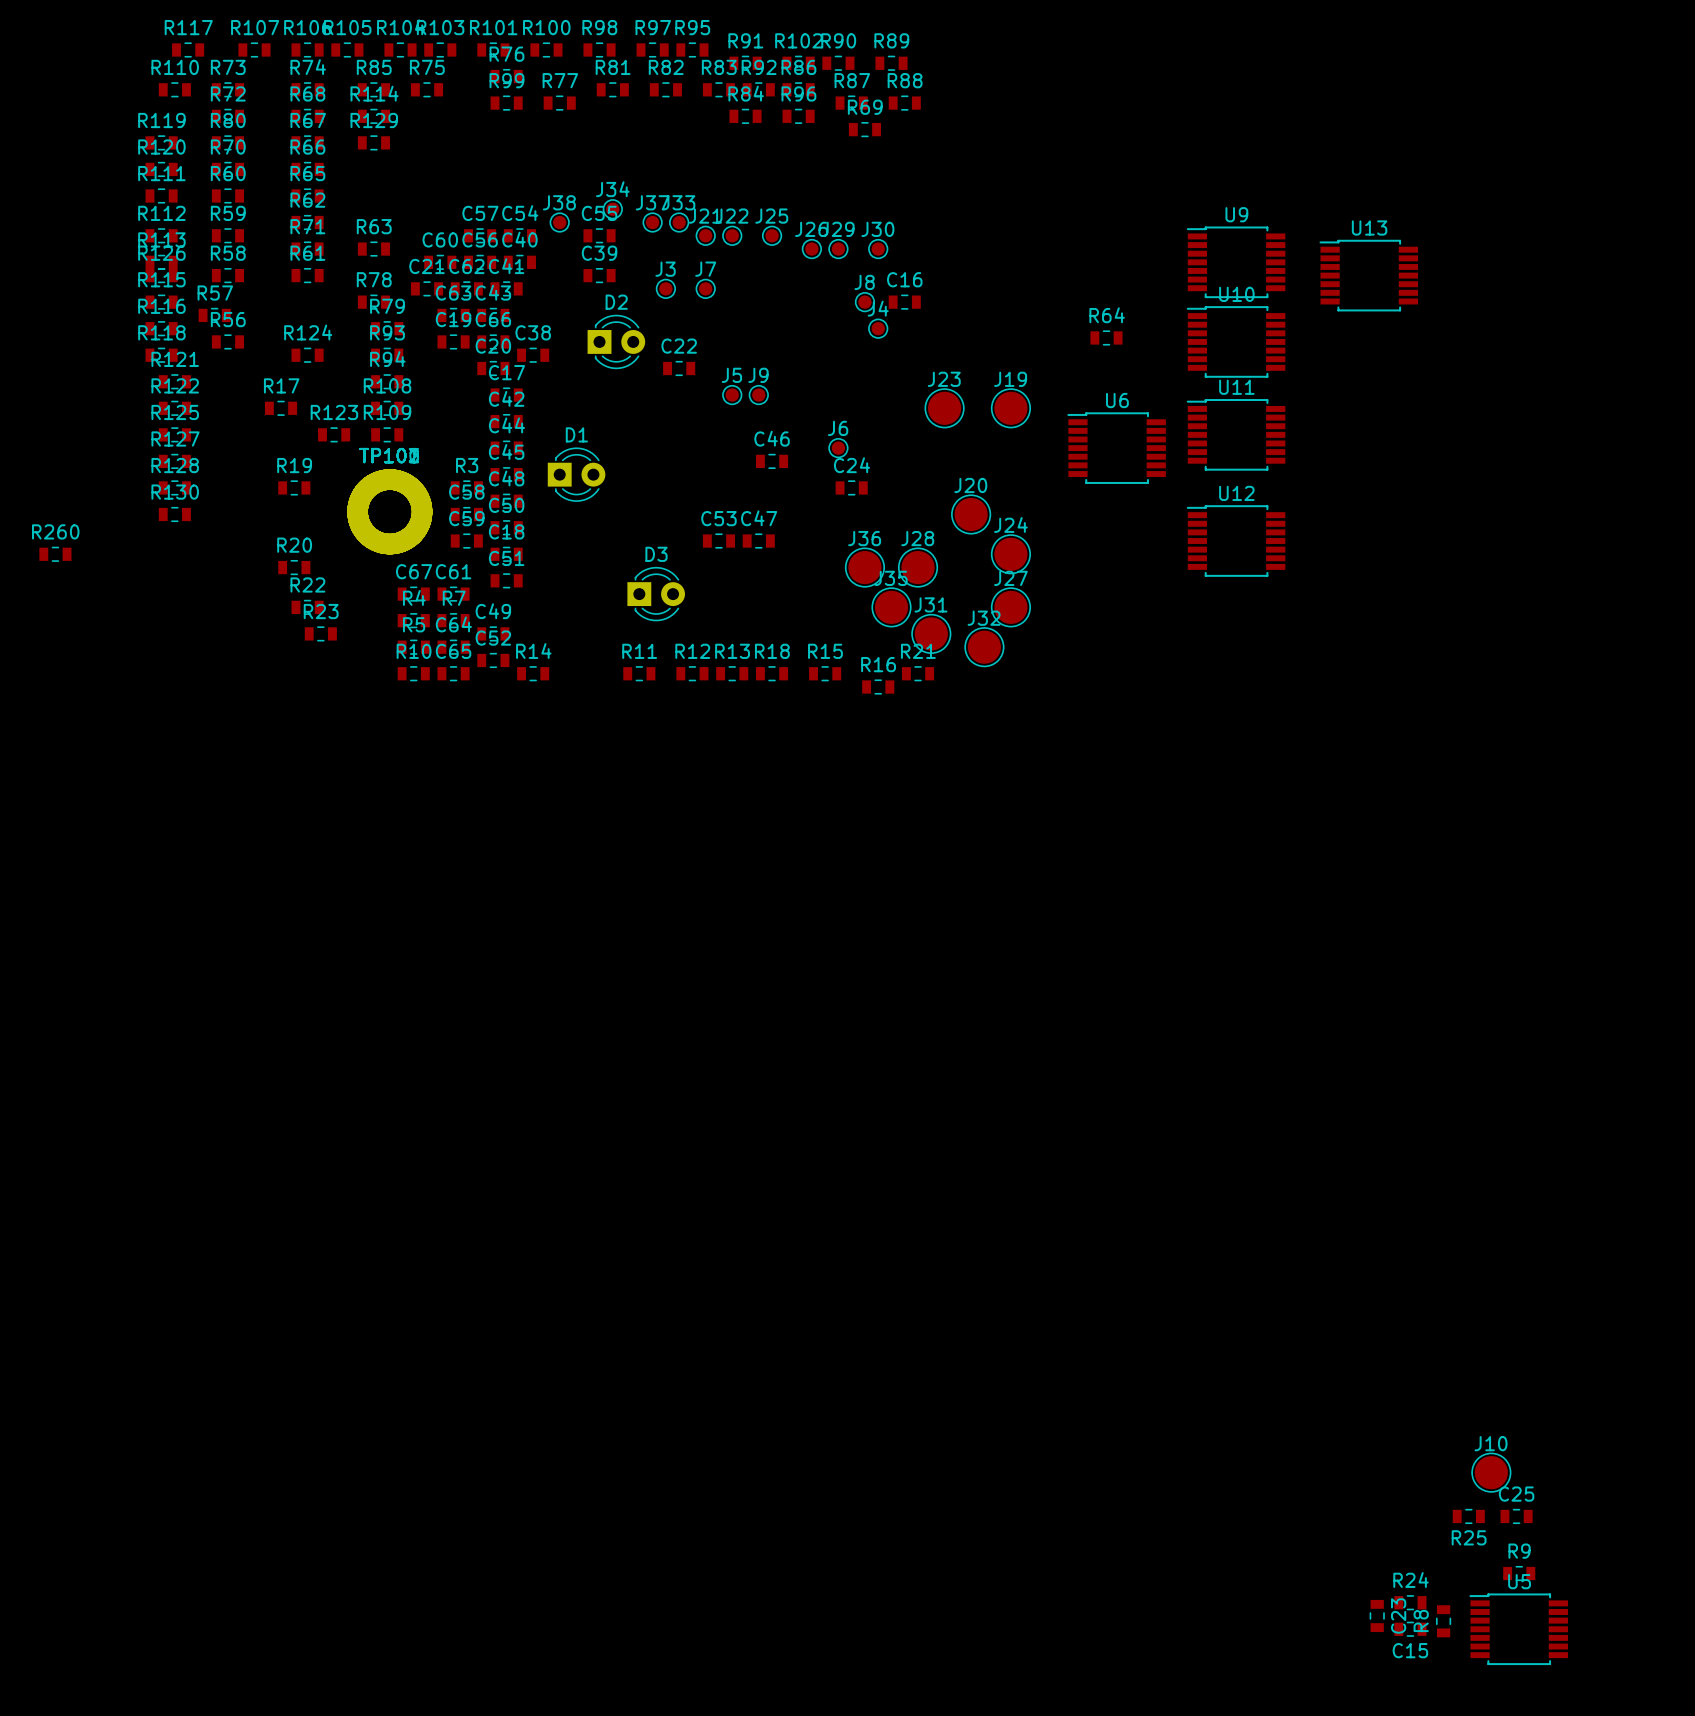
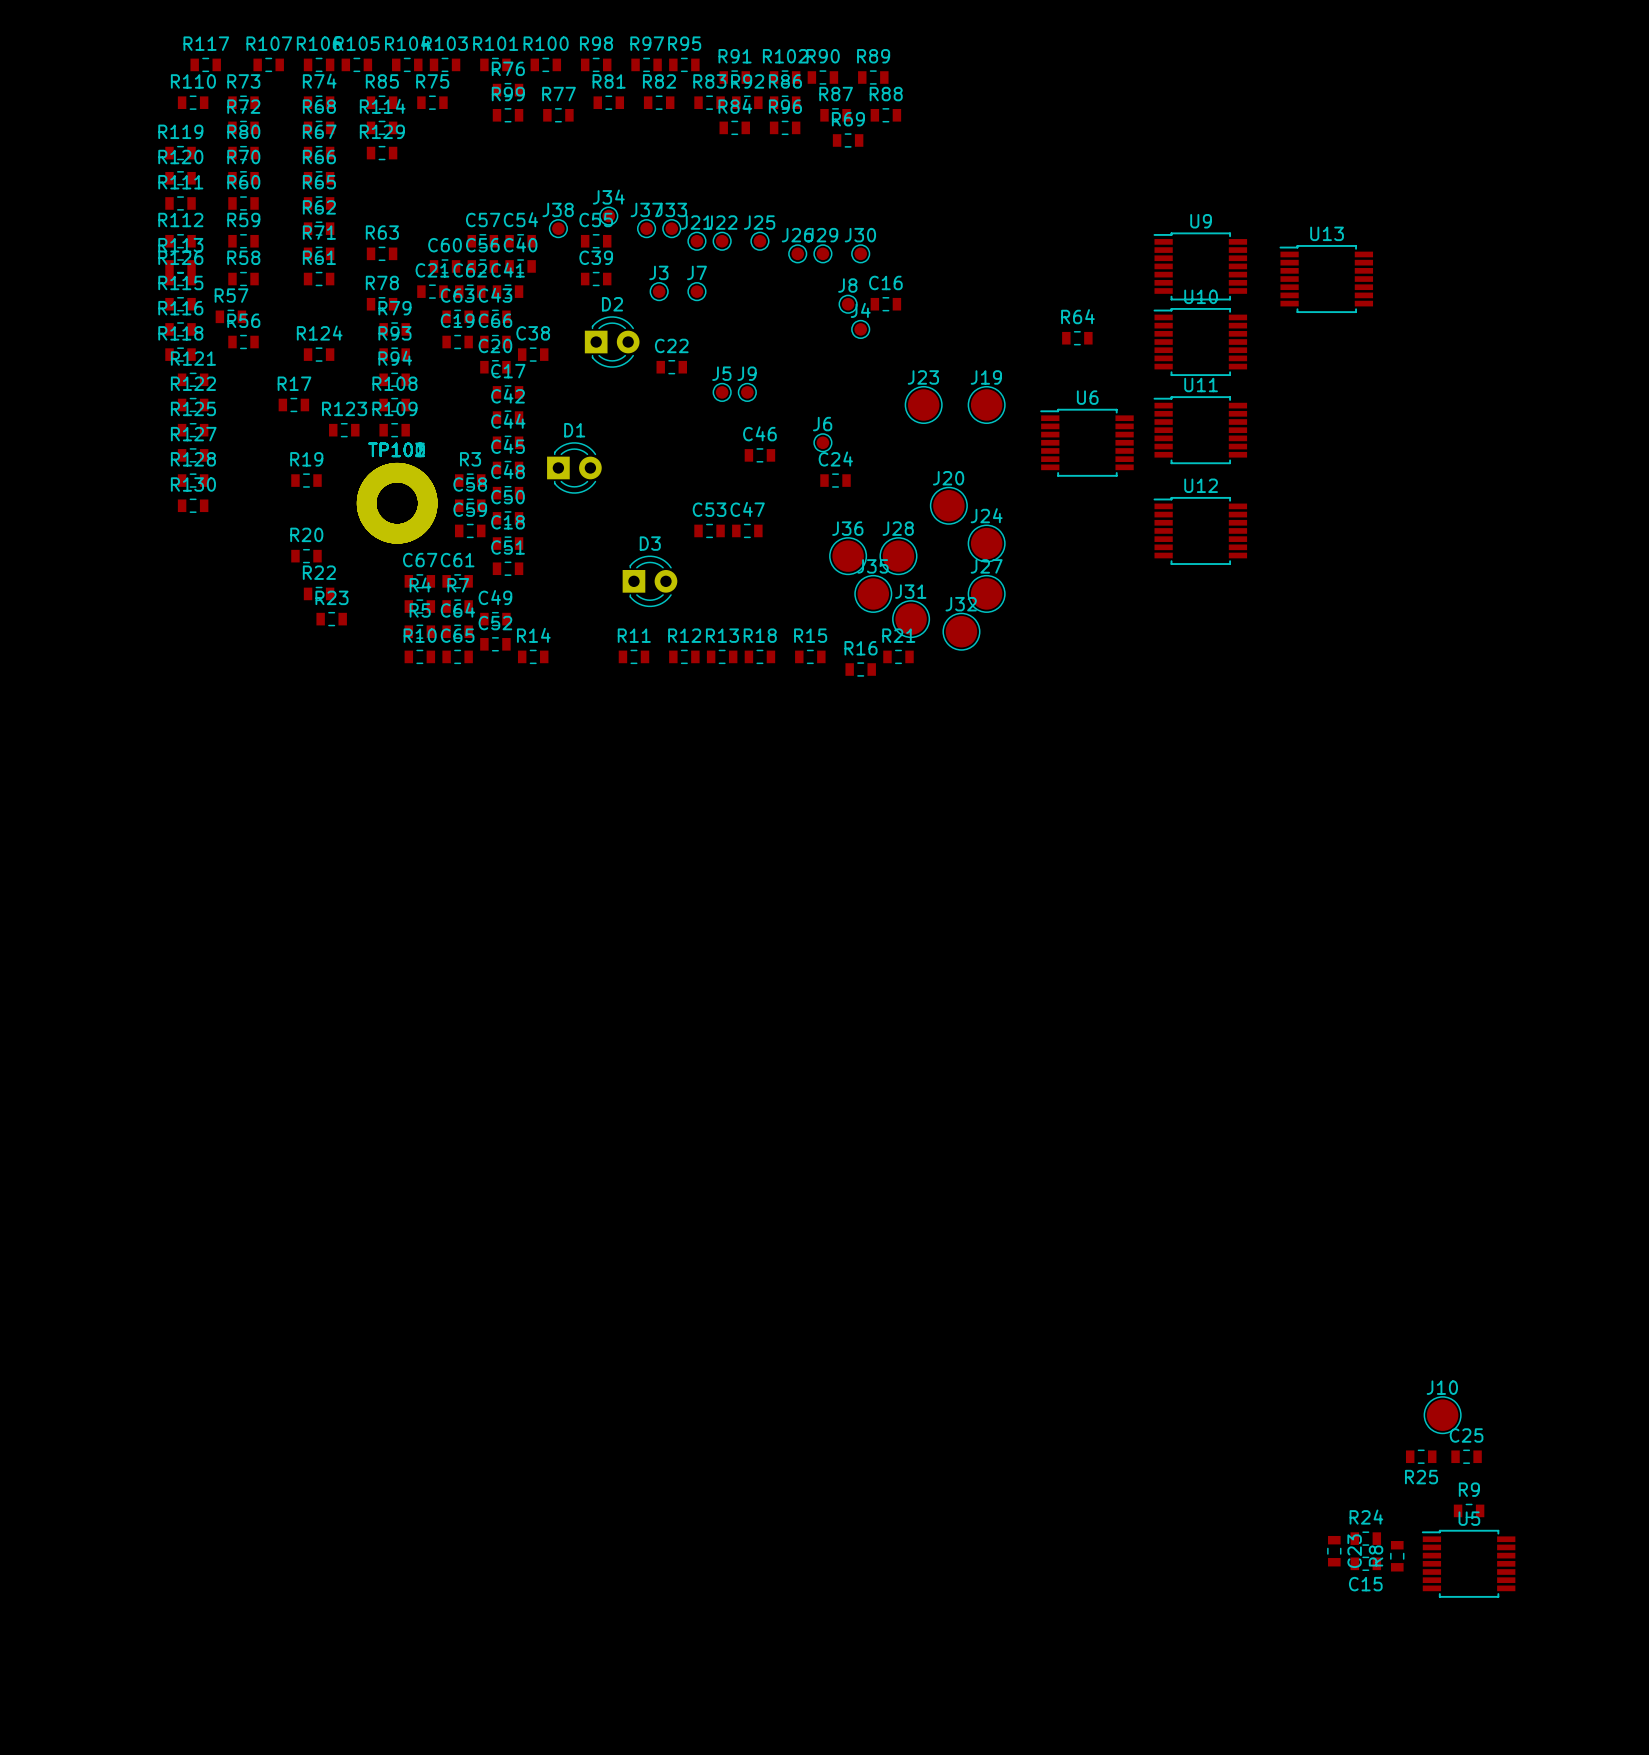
R260: (55, 554) -> none

